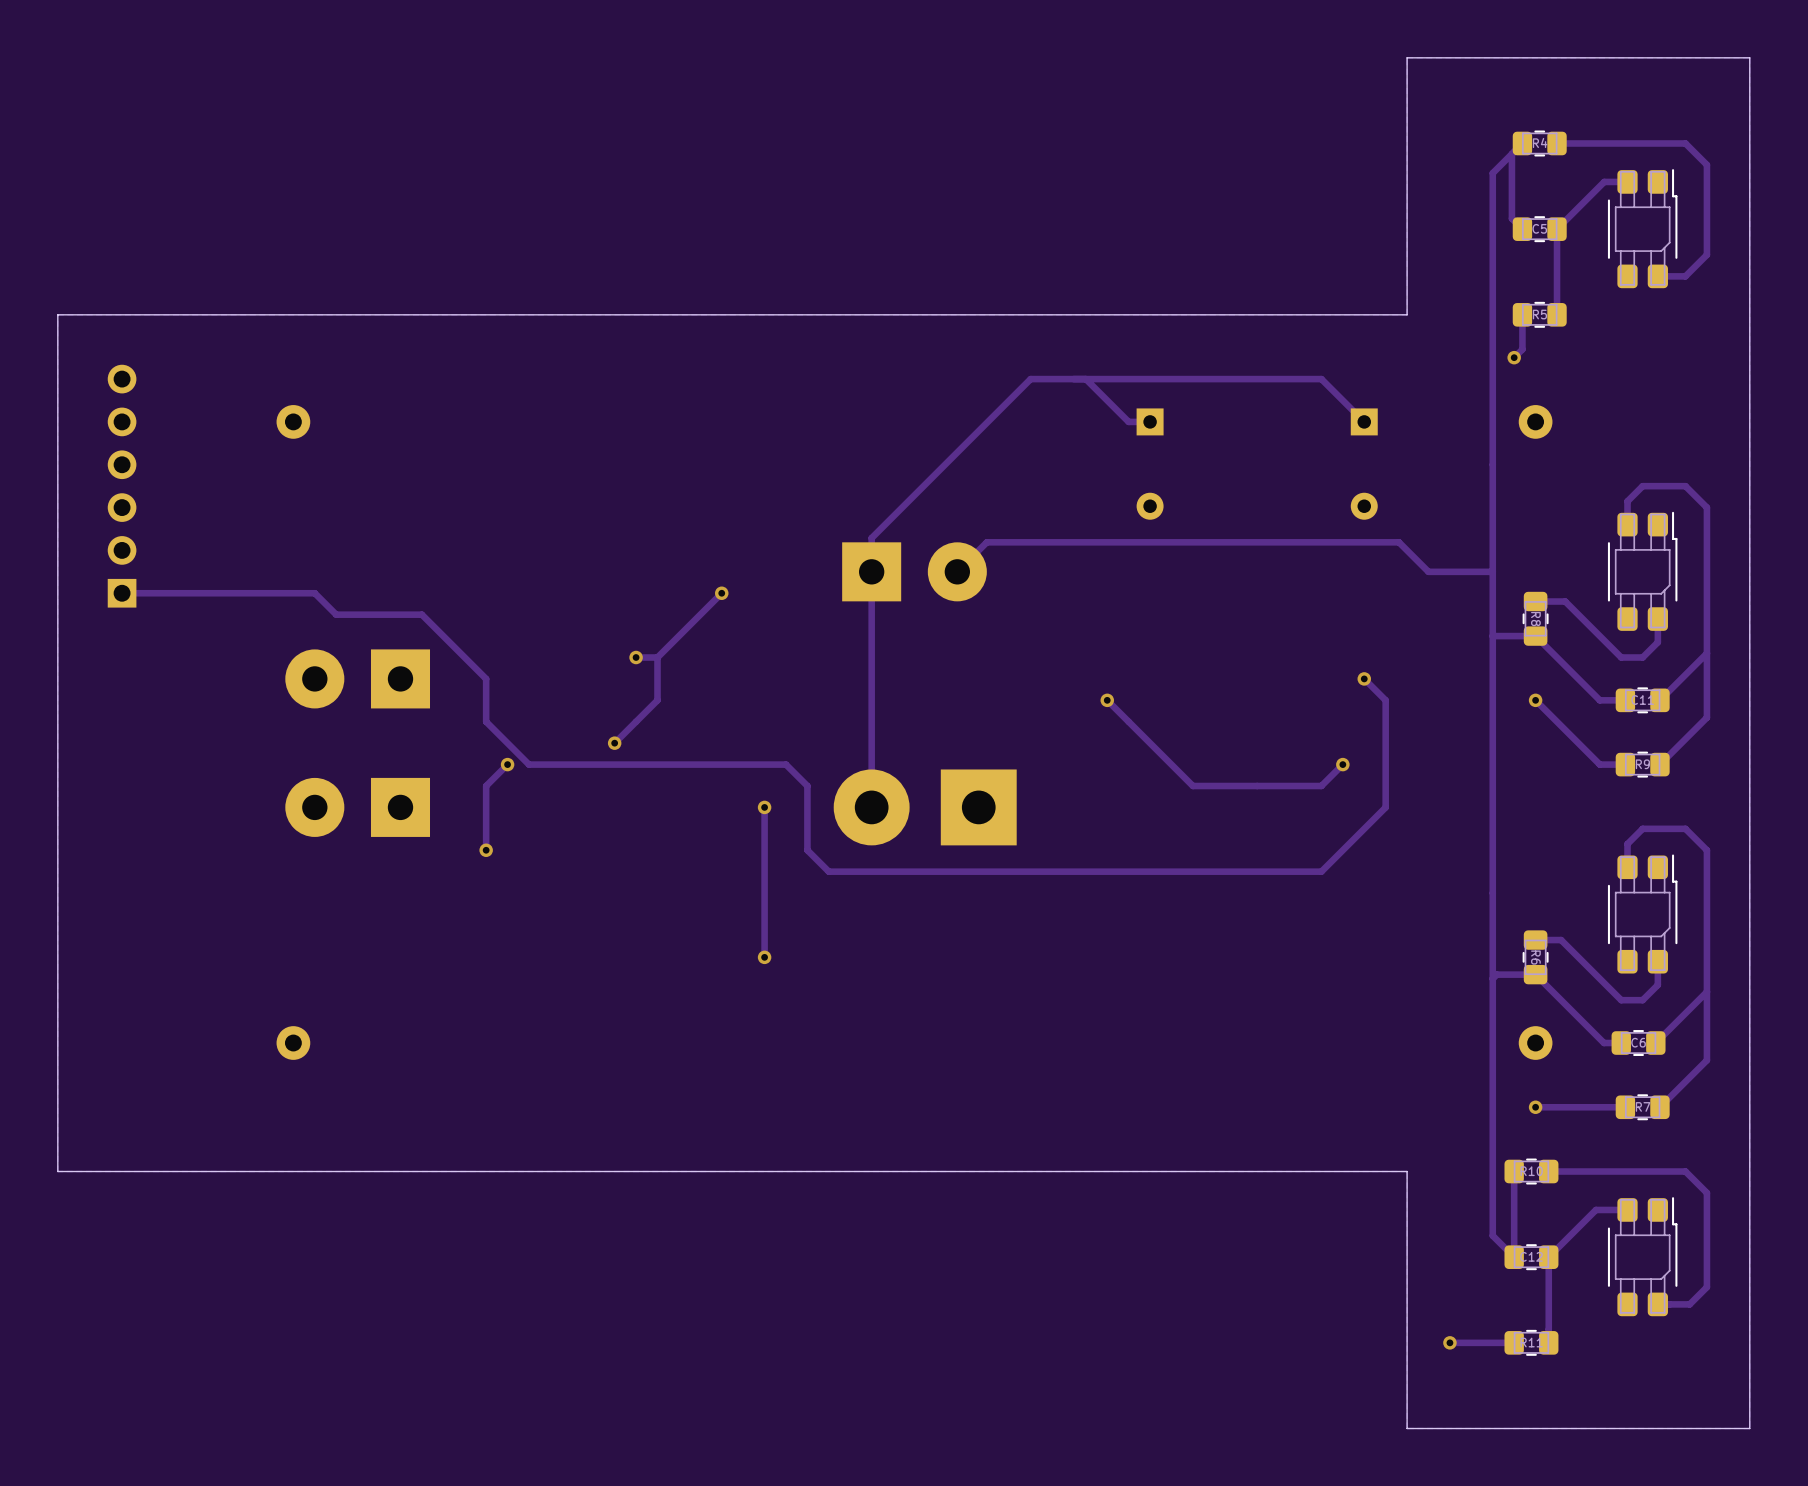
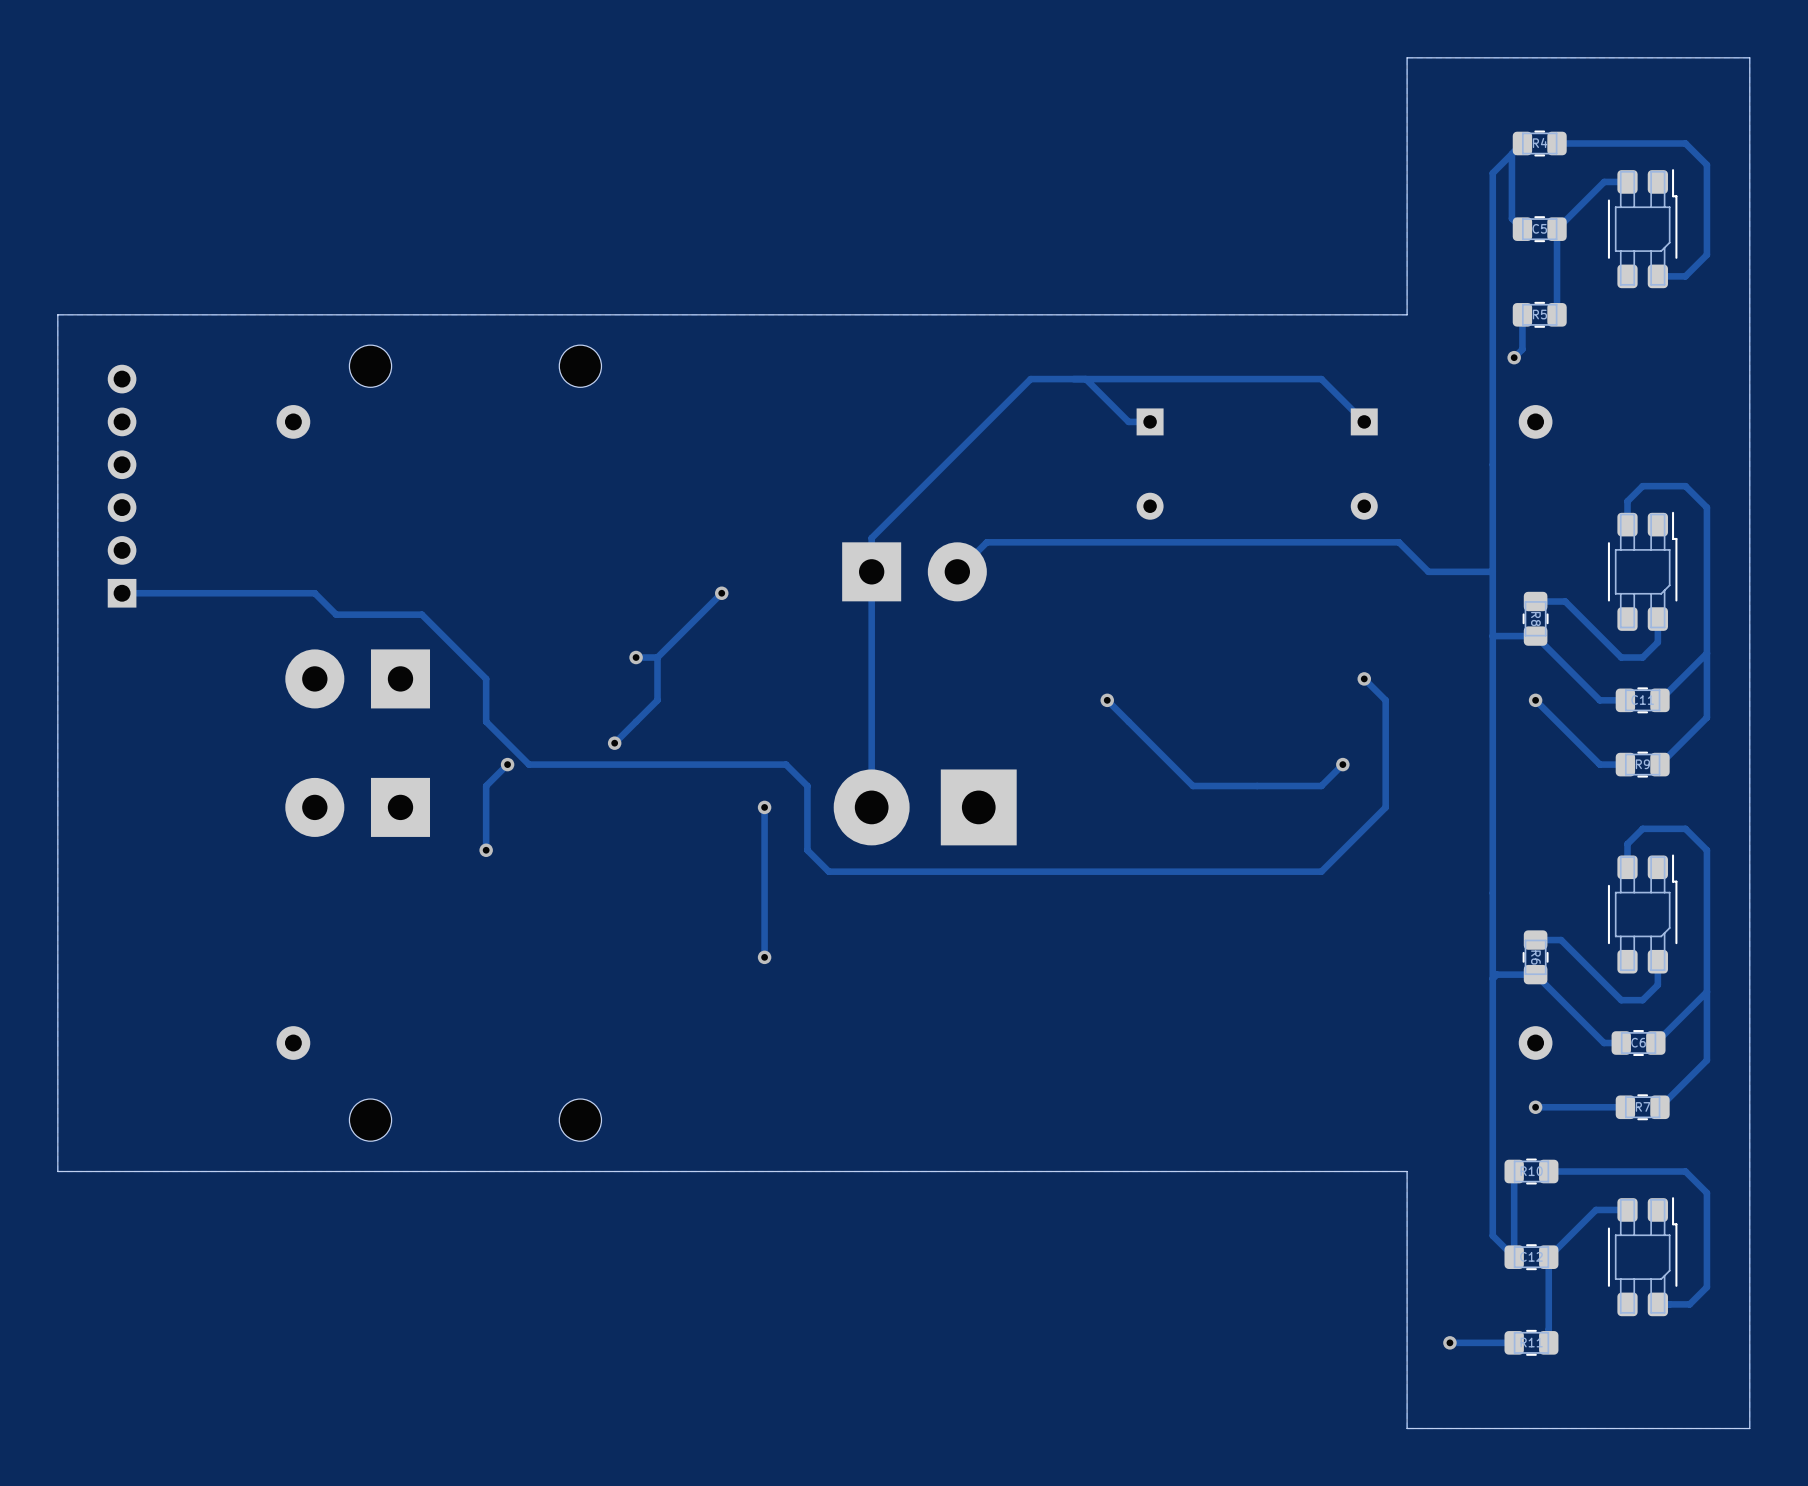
part: none -> (370, 366)
part: none -> (580, 366)
part: none -> (370, 1120)
part: none -> (580, 1120)

